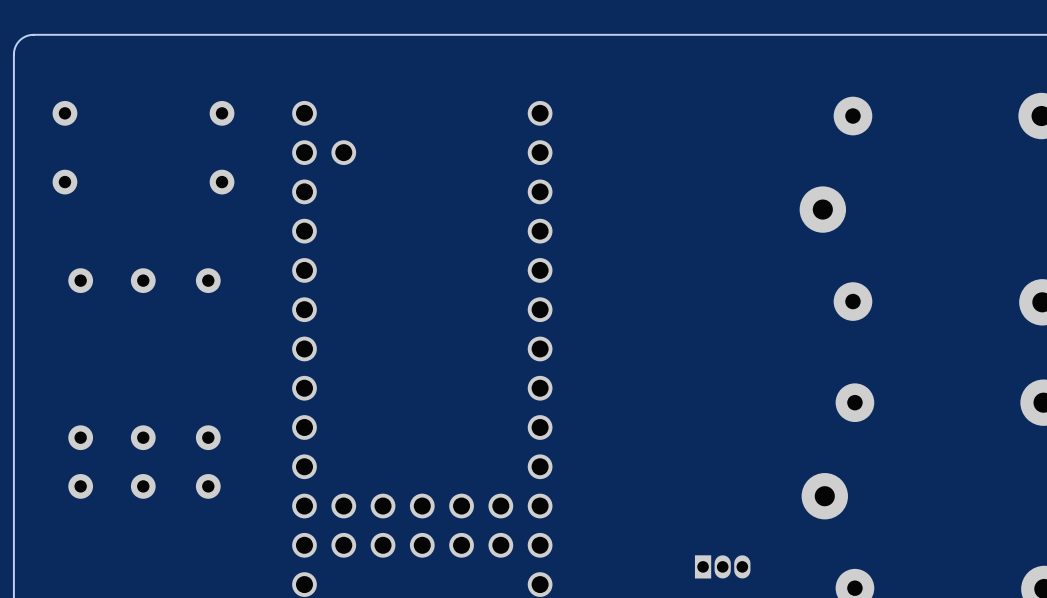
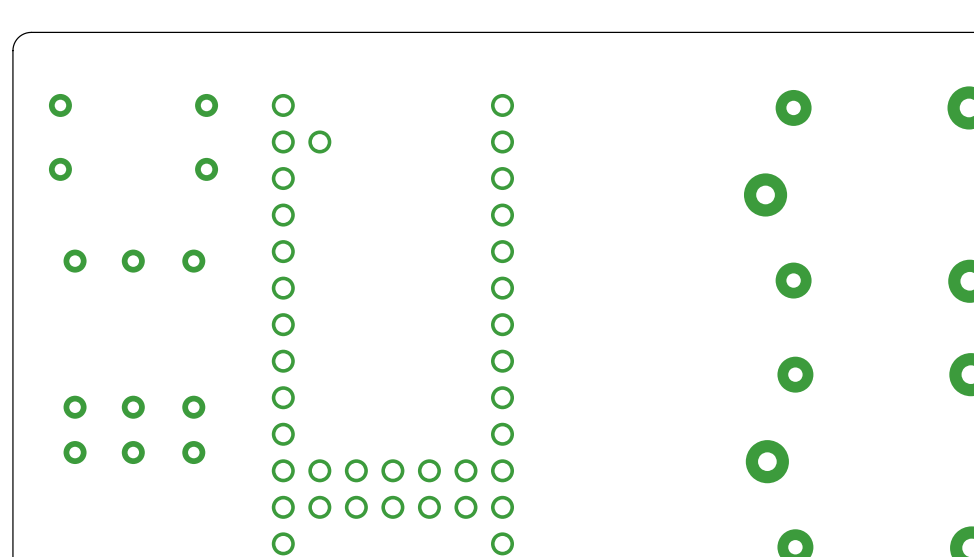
part: (722, 566) -> none

